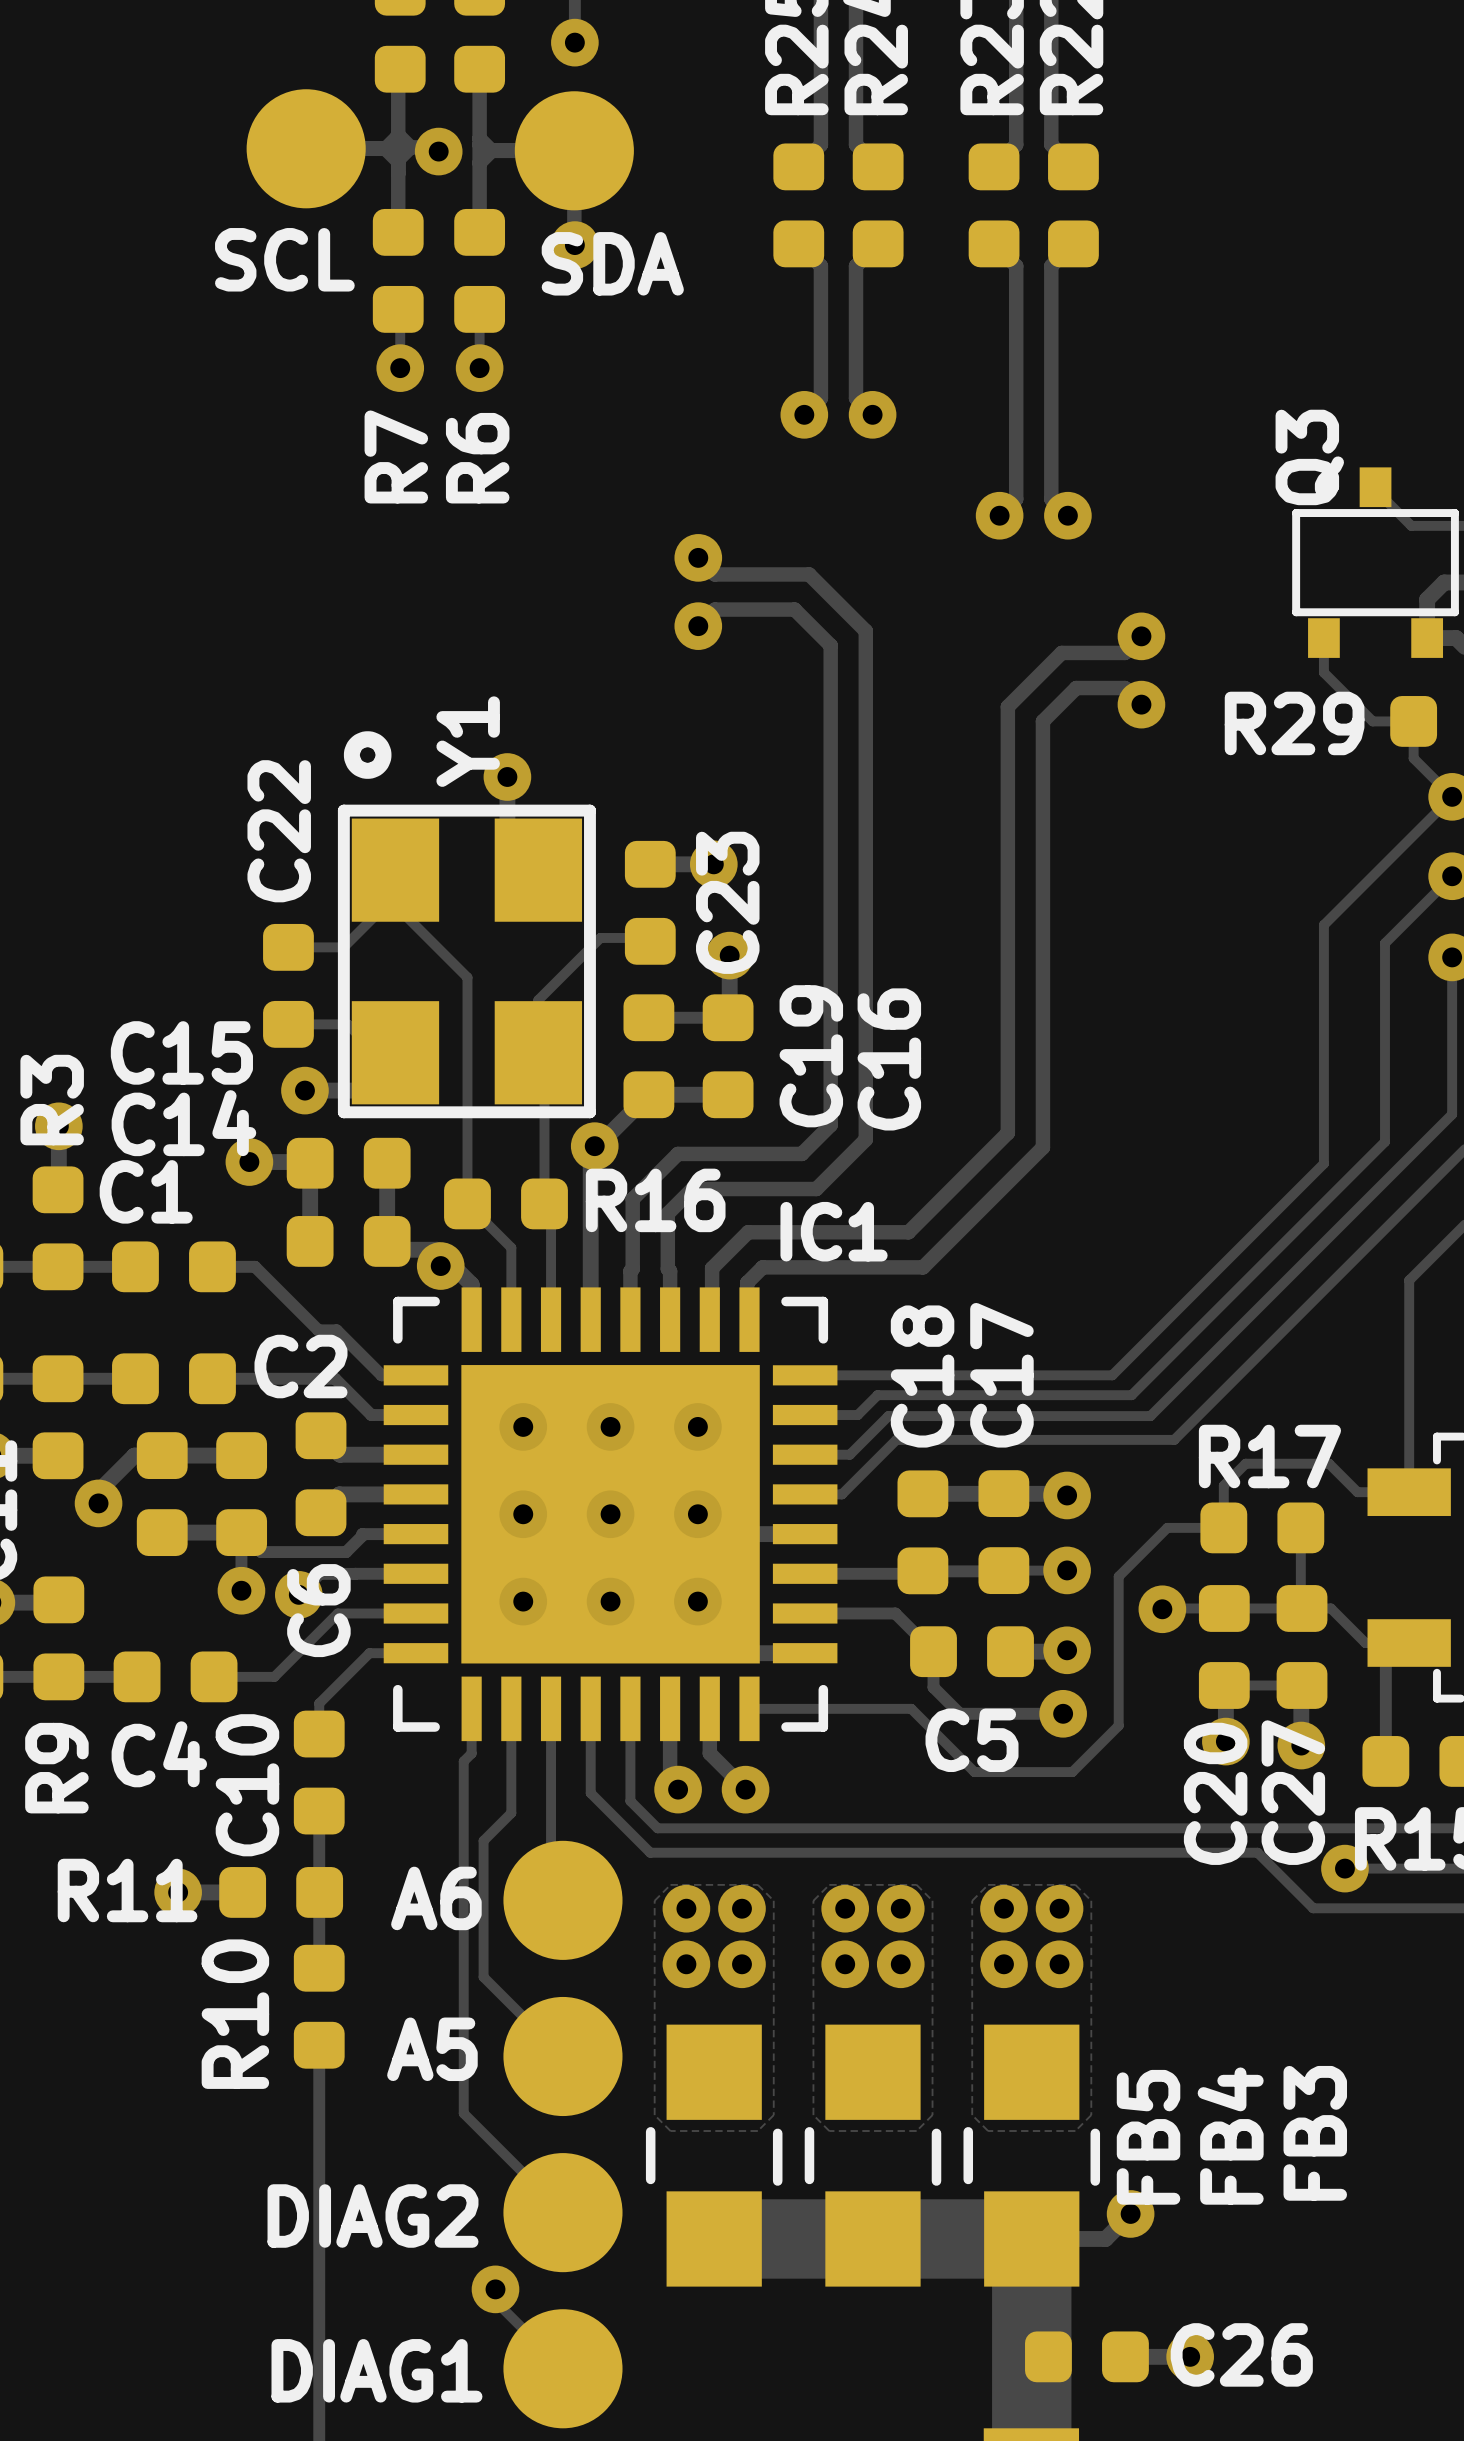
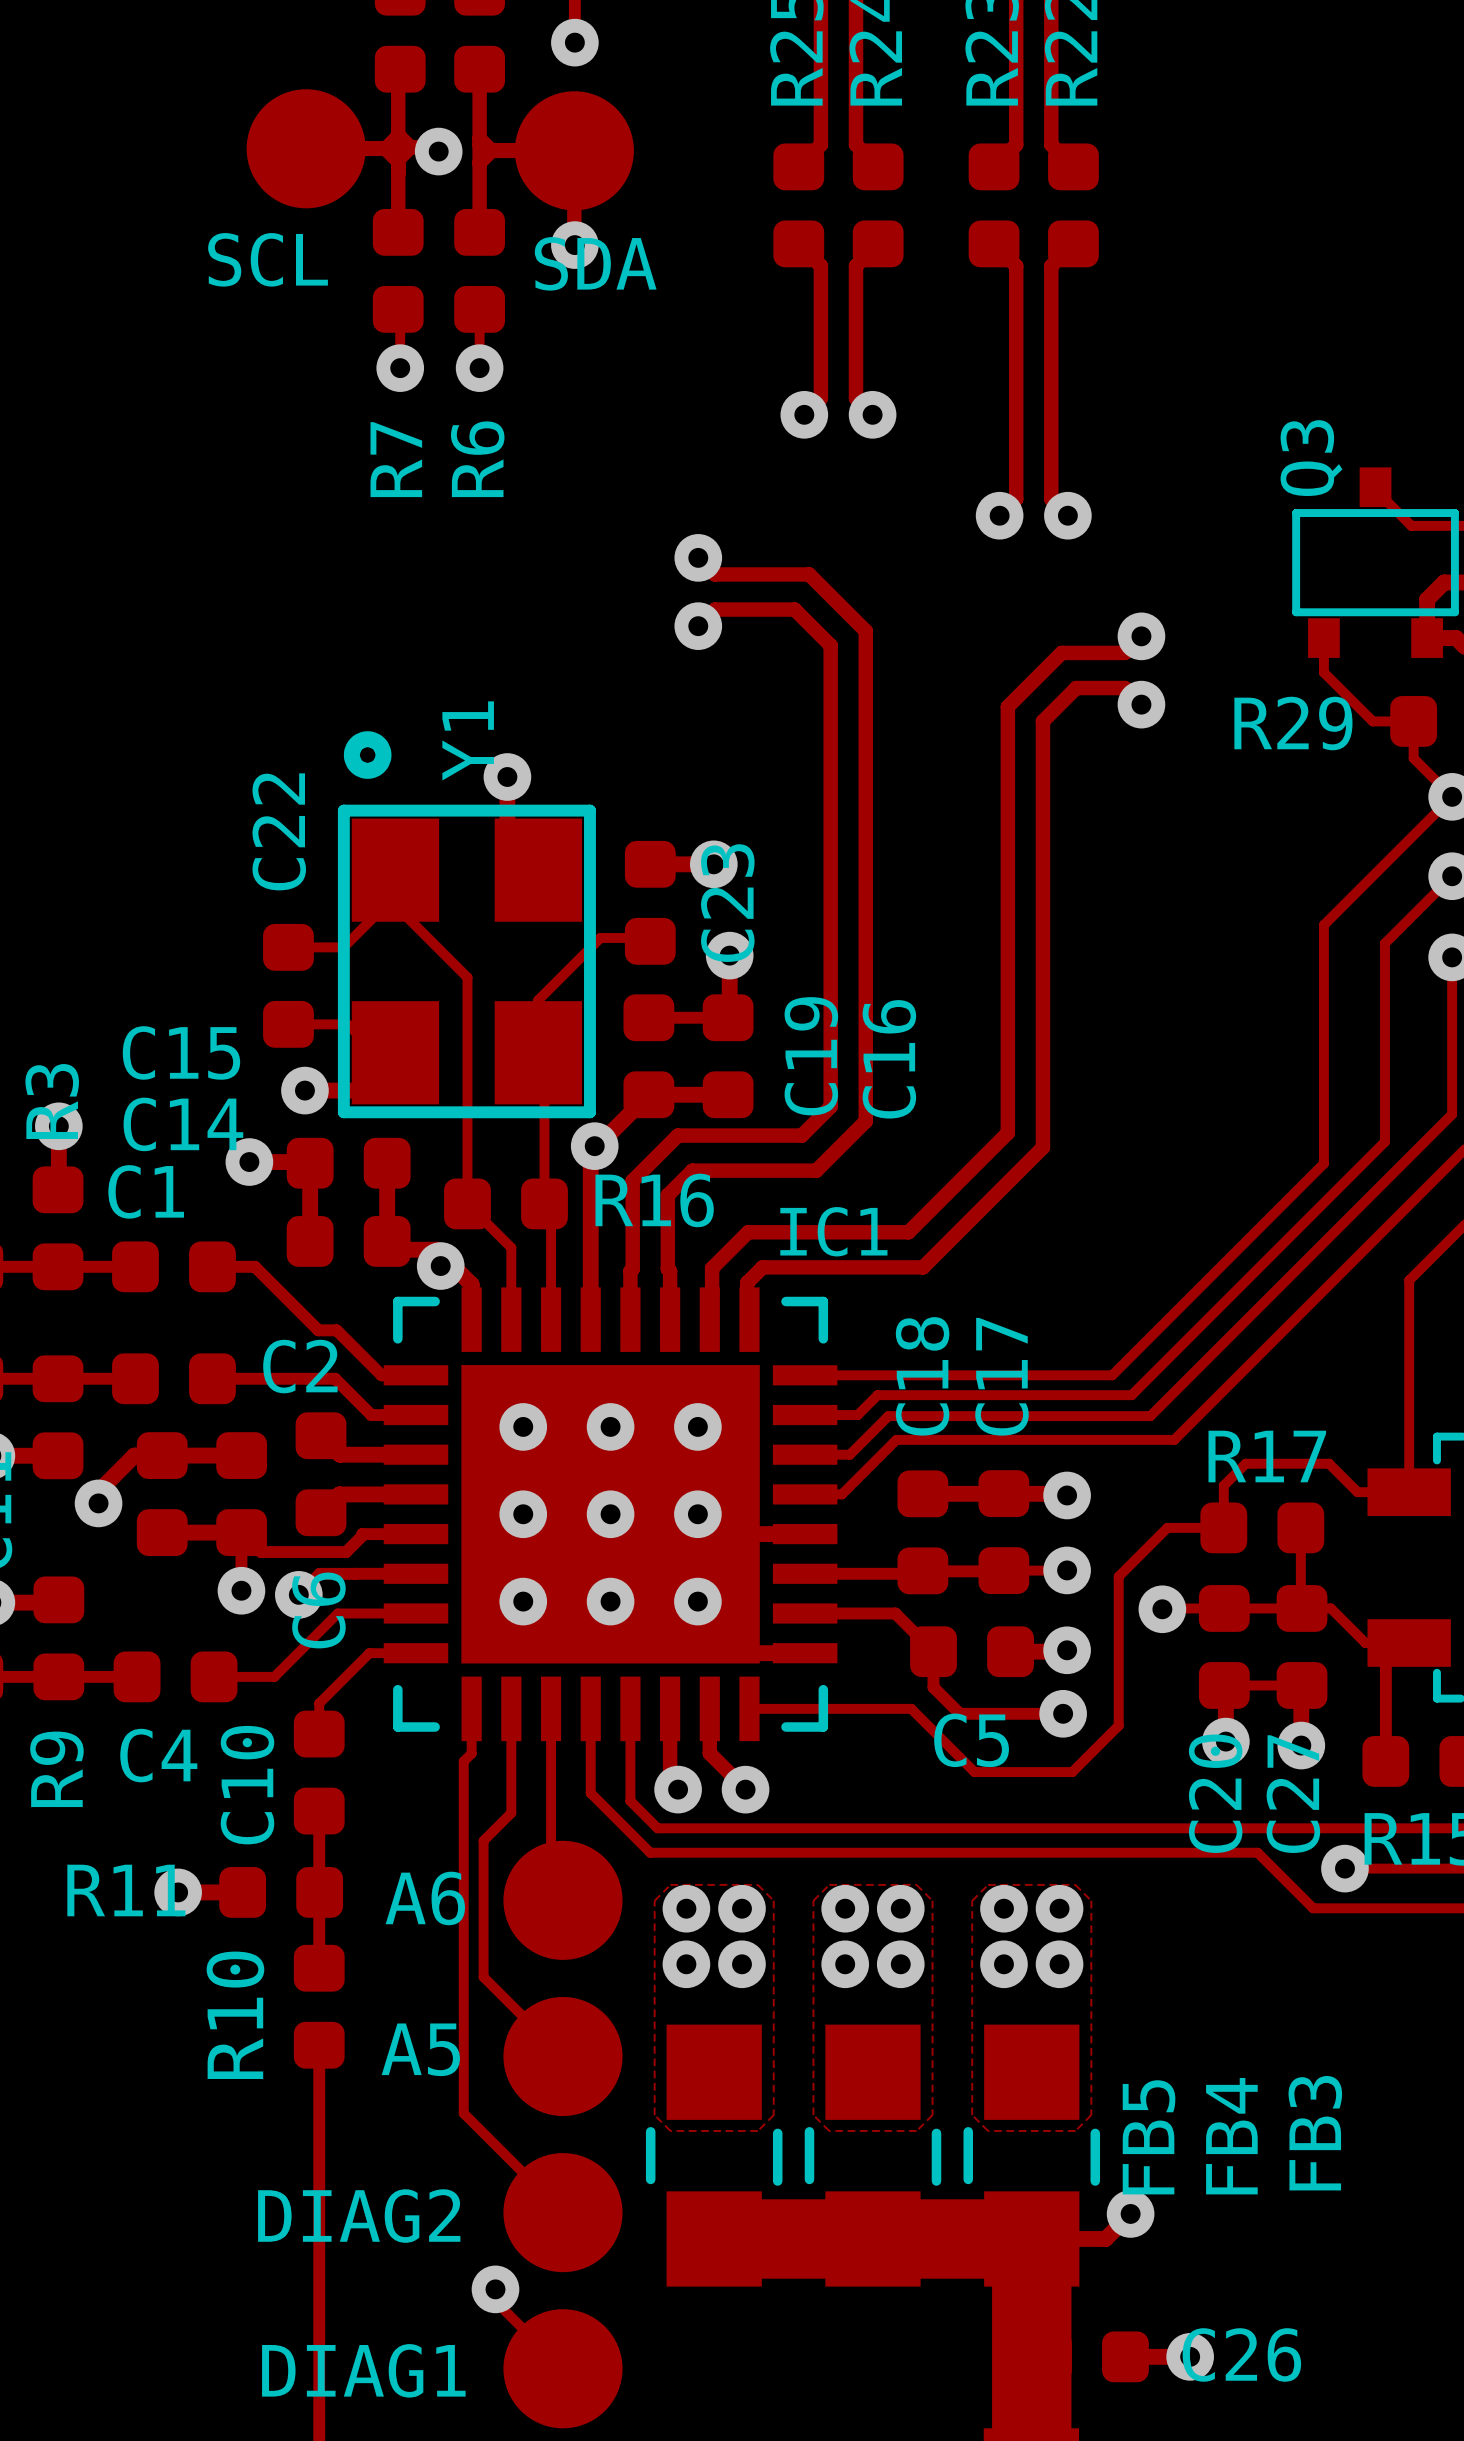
track: (830, 1106) (830, 1125) (801, 1153) (677, 1153) (632, 1199) -> (830, 1106) (801, 1135) (677, 1135) (632, 1180) (632, 1199)
track: (865, 1121) (865, 1139) (816, 1189) (692, 1189) (667, 1213) -> (865, 1121) (816, 1170) (692, 1170) (667, 1195) (667, 1213)

